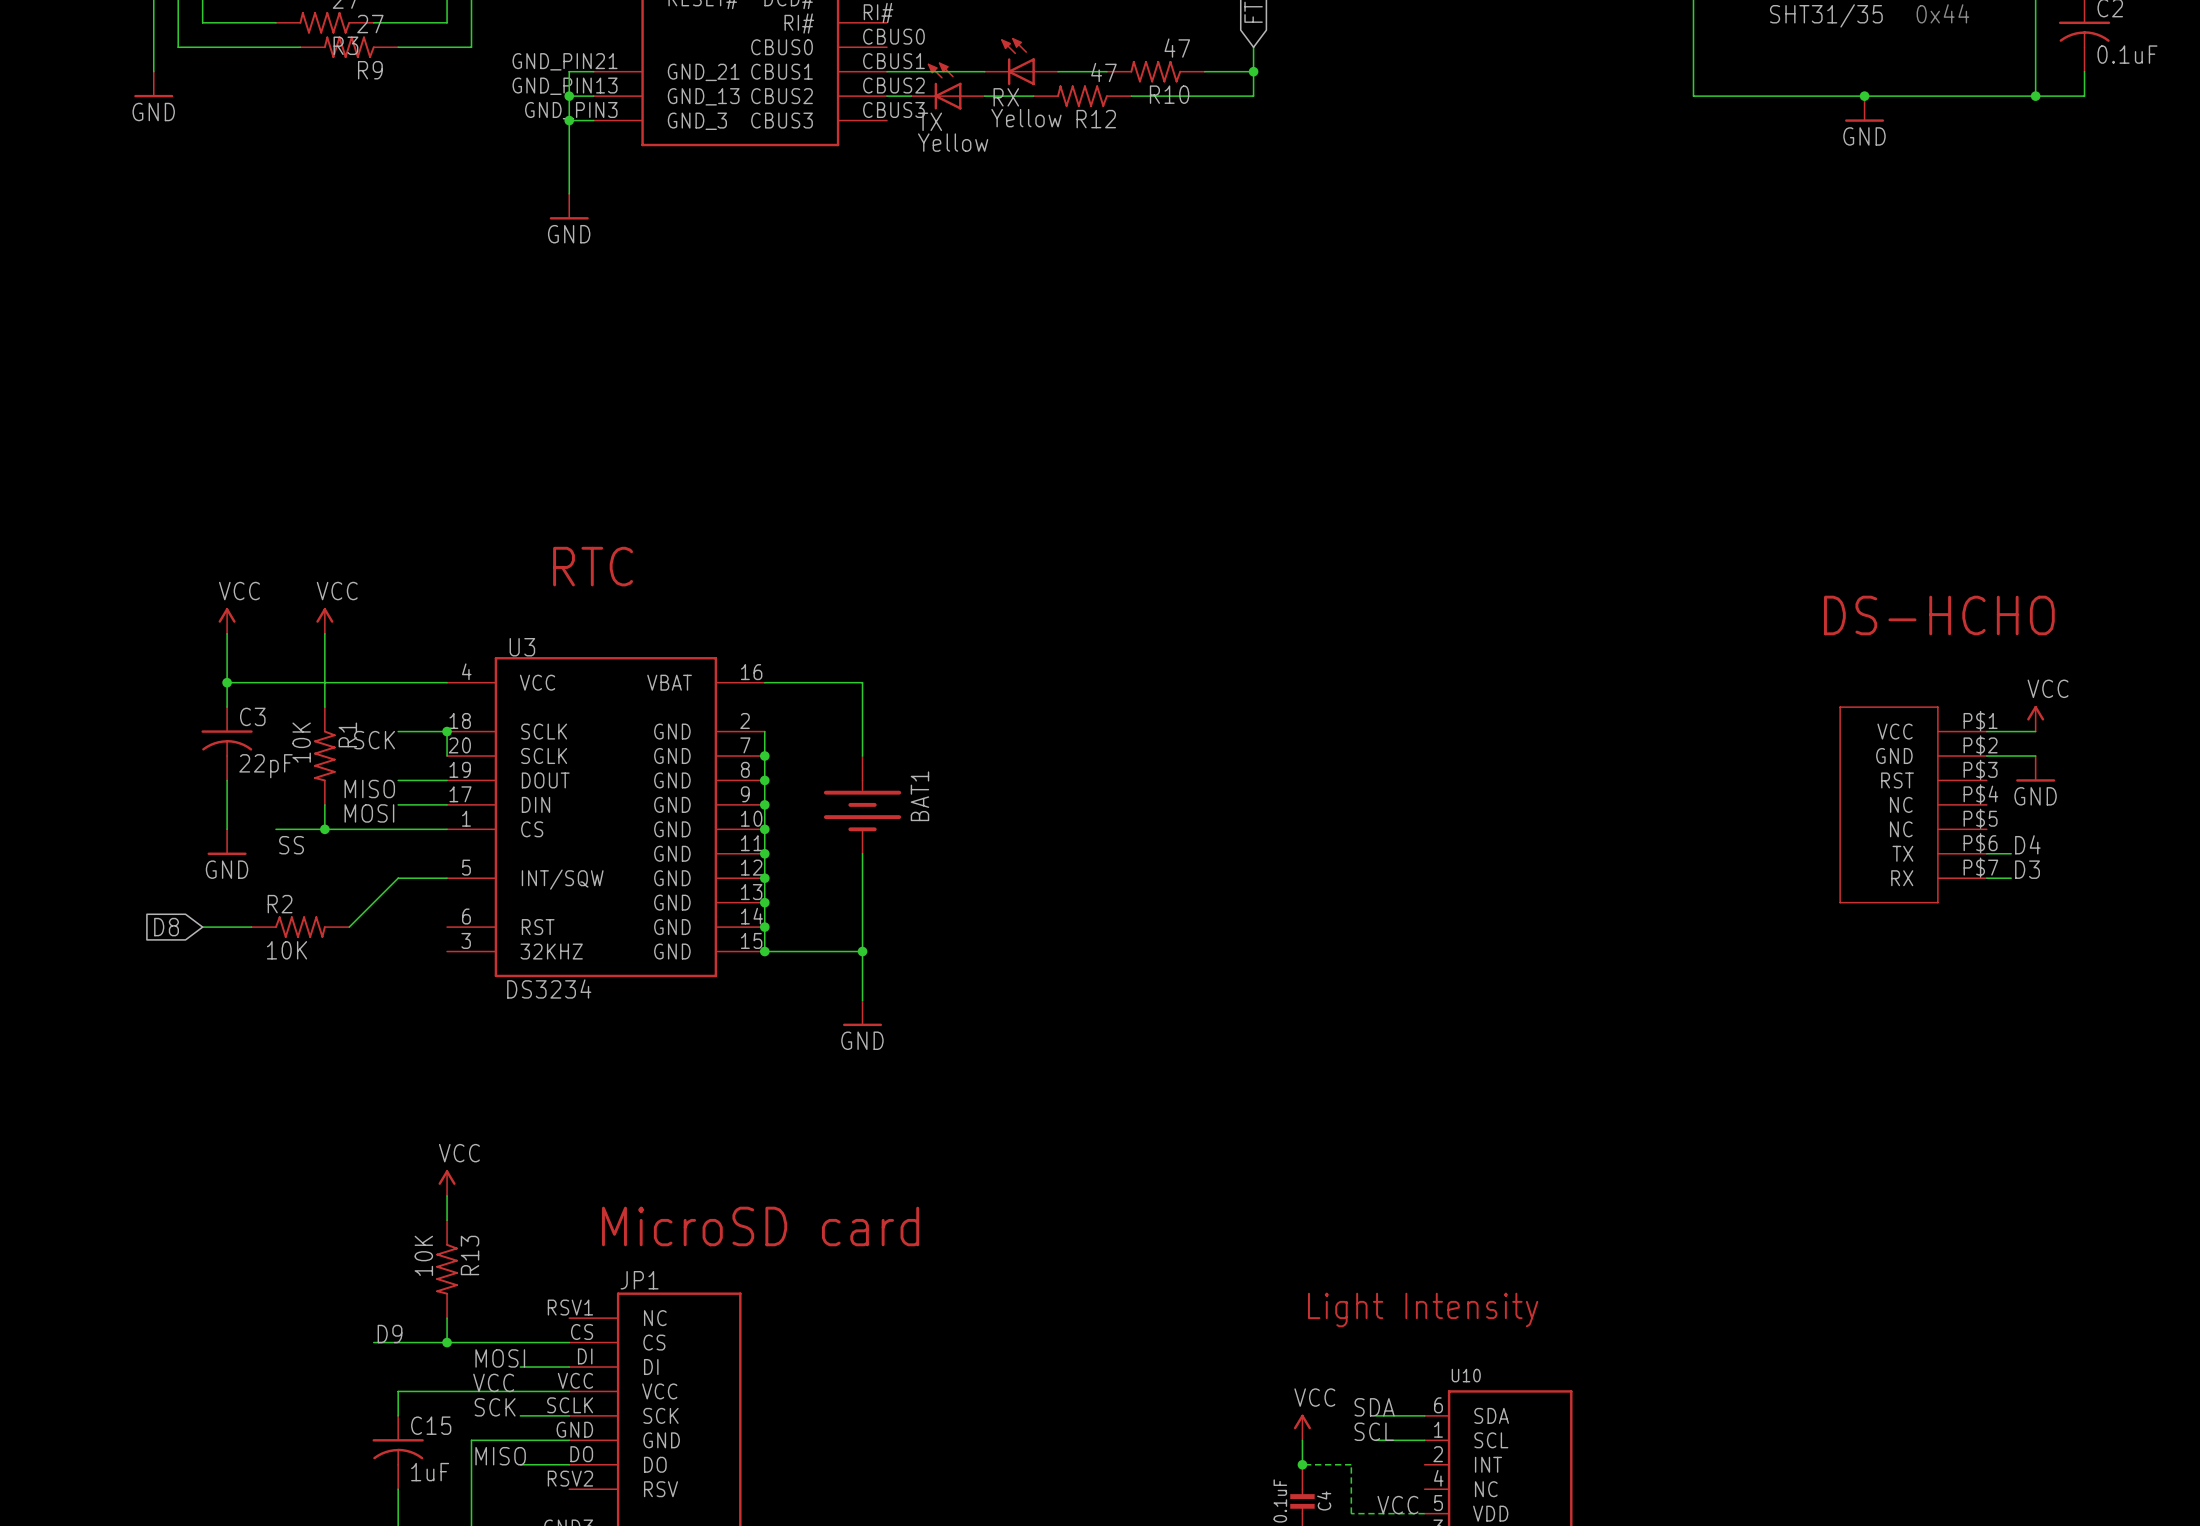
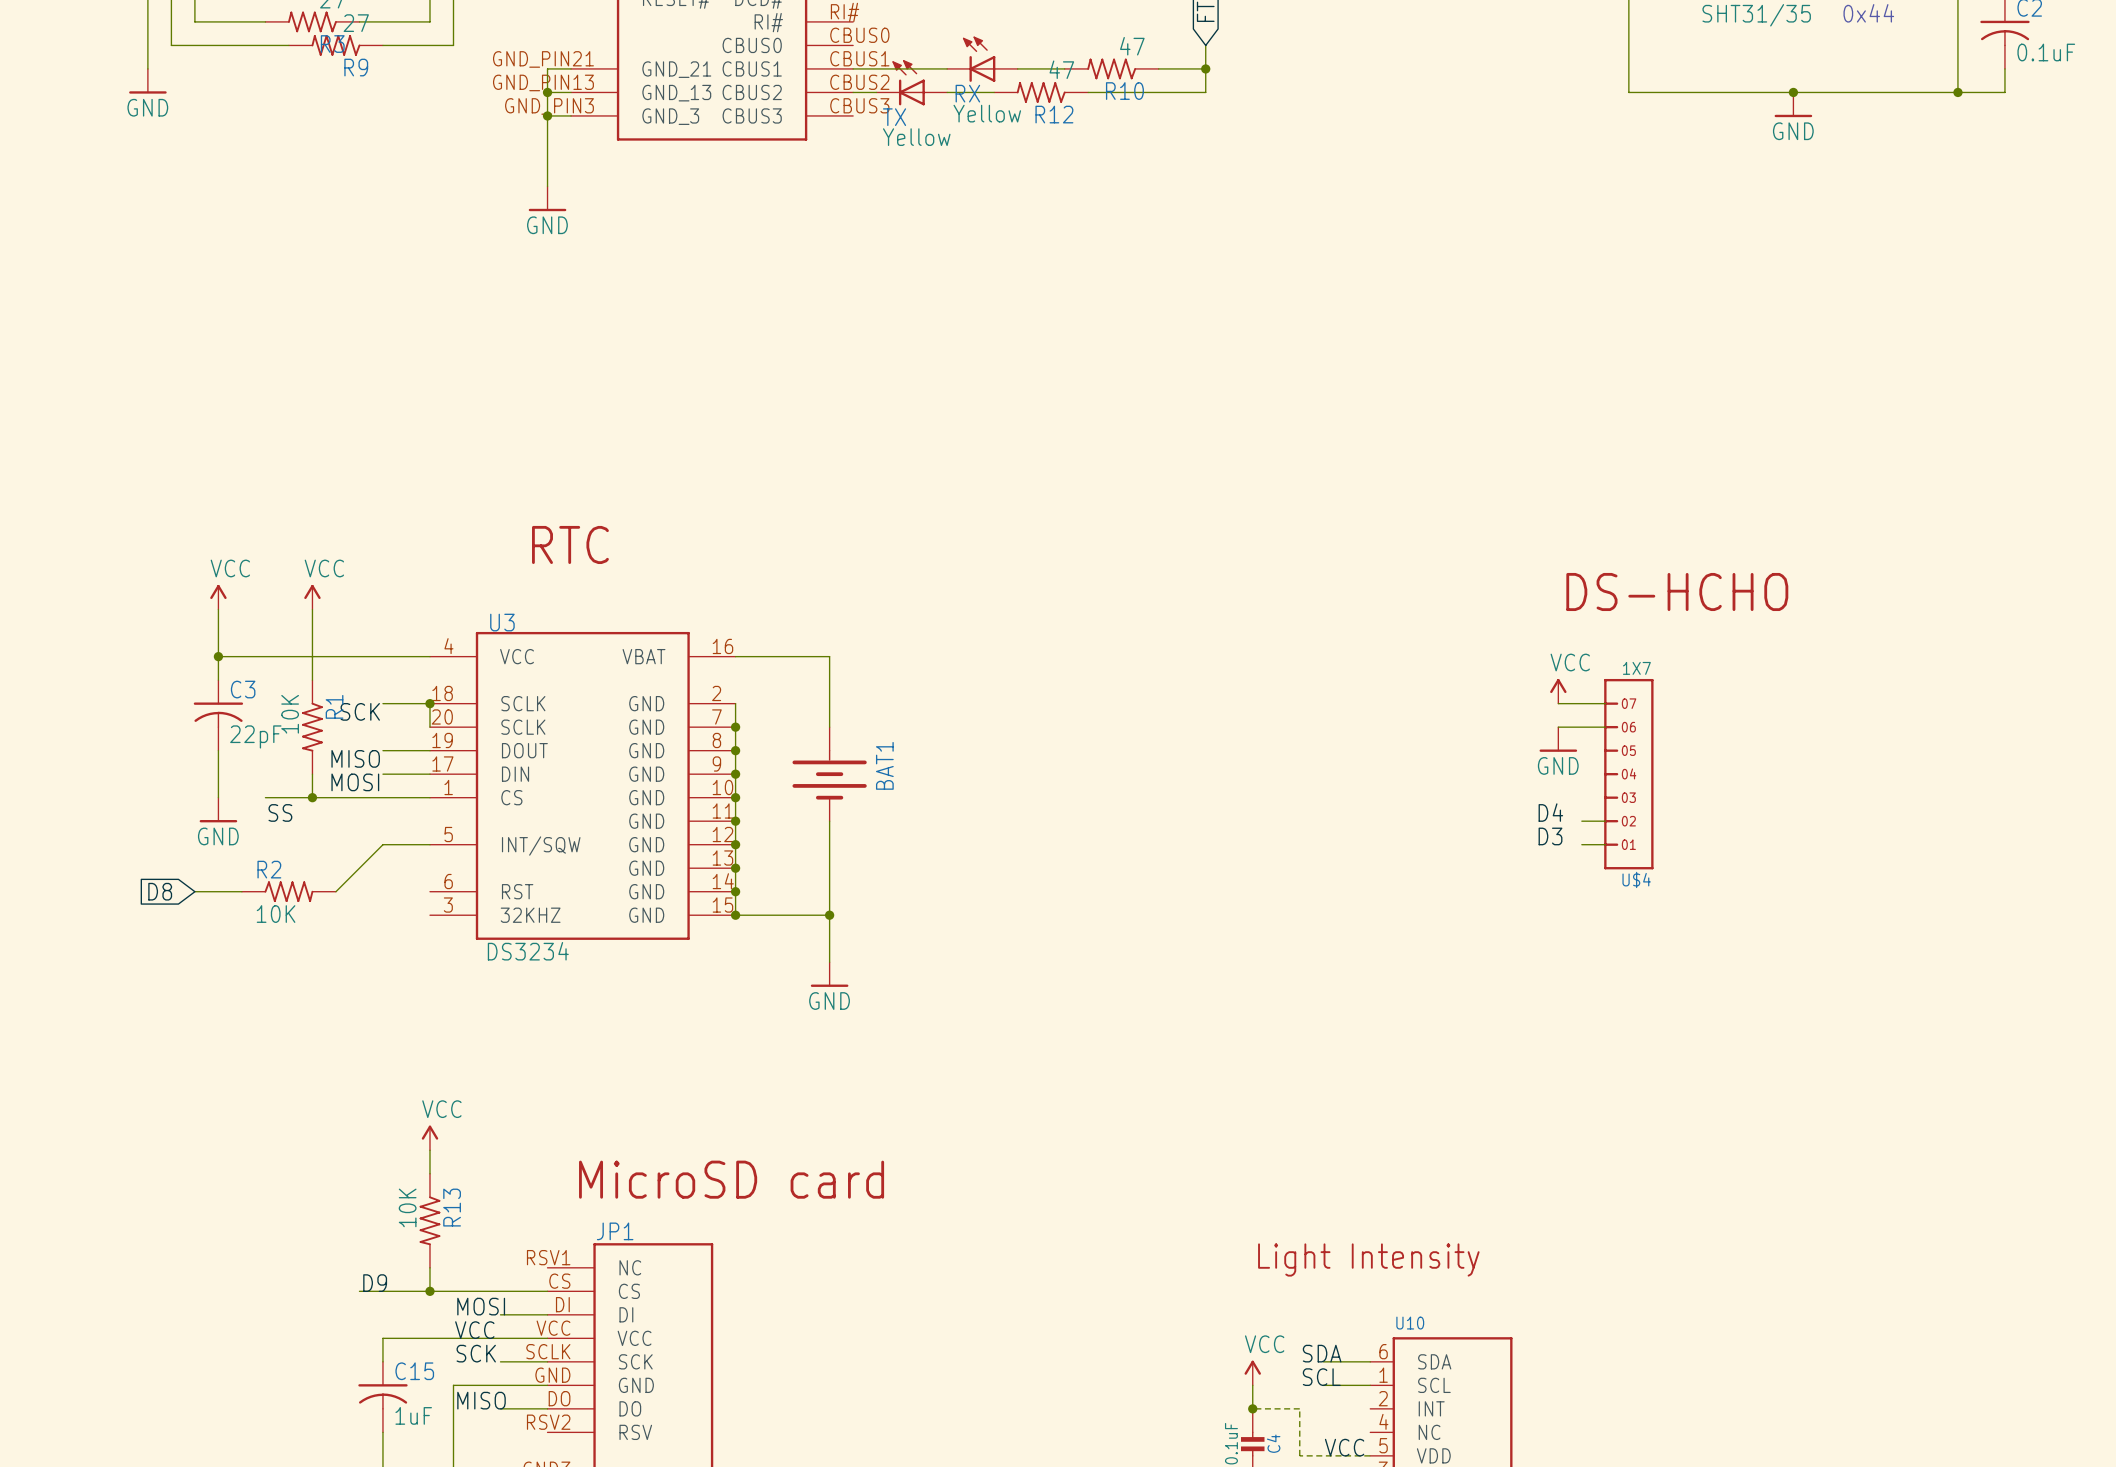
text position: DS-HCHO (1939, 615) -> DS-HCHO (1677, 591)
power symbol: none -> VCC (1558, 691)
power symbol: VCC (2035, 718) -> none
wire: none -> (1558, 703) (1605, 703)
wire: (1986, 731) (2035, 731) -> none
wire: none -> (1558, 727) (1605, 727)
wire: (1986, 756) (2035, 756) -> none
power symbol: none -> GND (1558, 739)
power symbol: GND (2035, 768) -> none
U$4: none -> 1X7 (1628, 774)
part: (1913, 804) -> none
label: none -> D4 (1550, 812)
label: D4 (2027, 844) -> none
wire: none -> (1581, 821) (1605, 821)
wire: (1986, 853) (2011, 853) -> none
label: none -> D3 (1550, 836)
label: D3 (2027, 869) -> none
wire: none -> (1581, 844) (1605, 844)
wire: (1986, 878) (2011, 878) -> none

